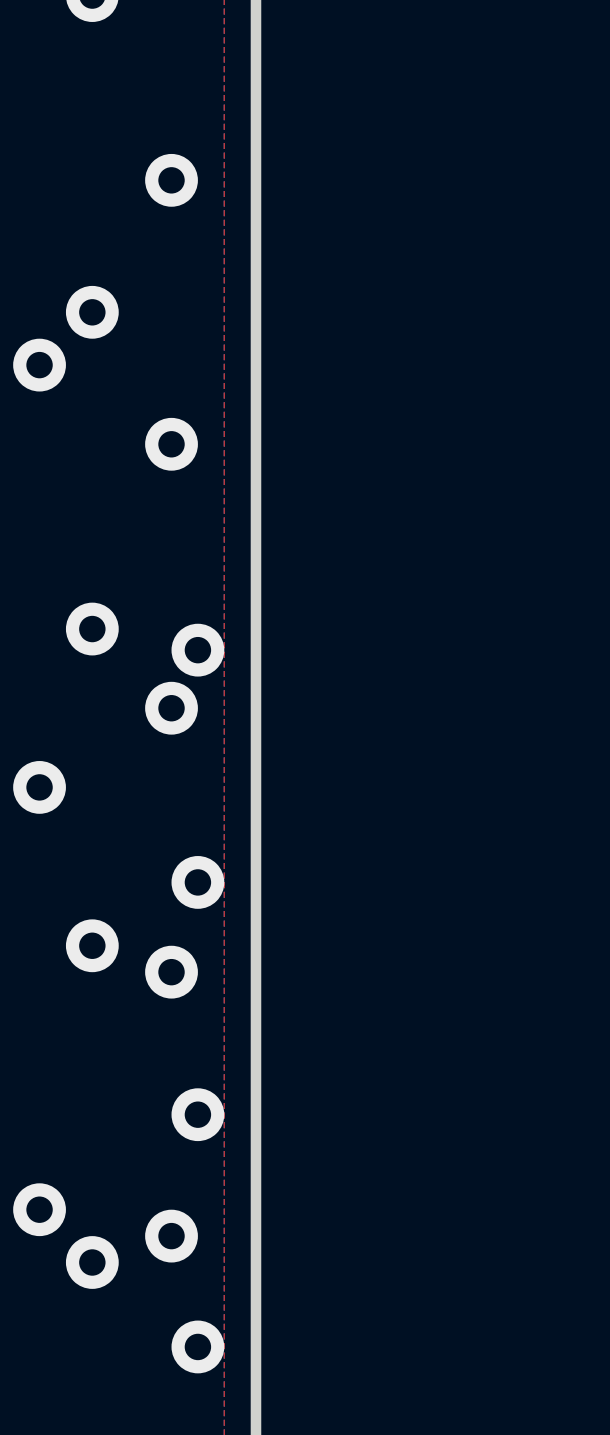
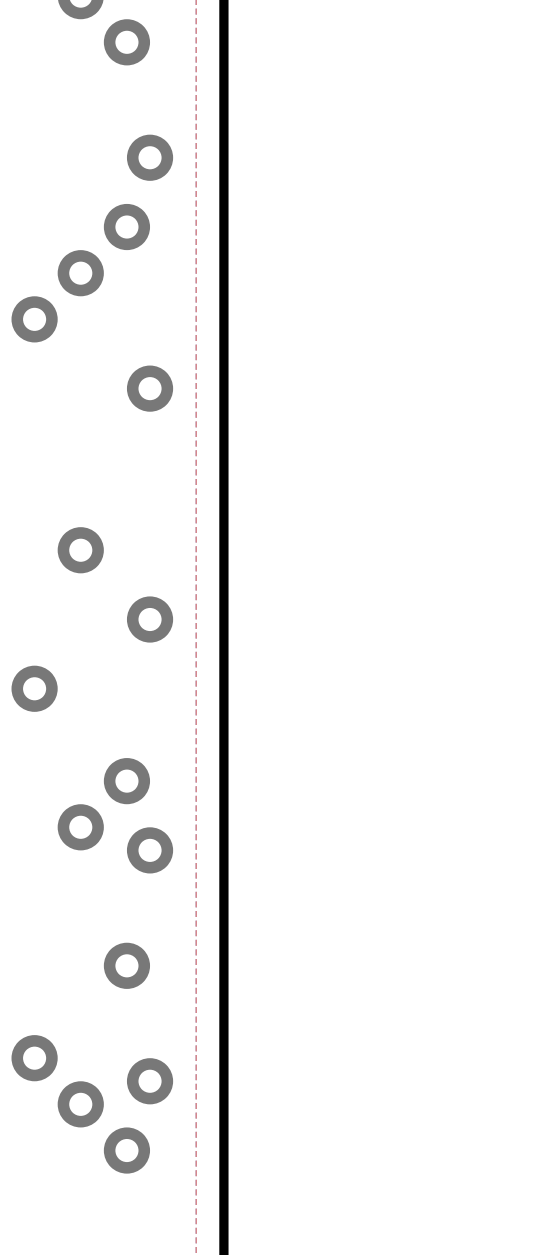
via: none -> (126, 42)
via: none -> (126, 227)
via: (197, 650) -> none
via position: (197, 882) -> (126, 781)
via position: (197, 1114) -> (126, 965)
via position: (197, 1346) -> (126, 1150)

